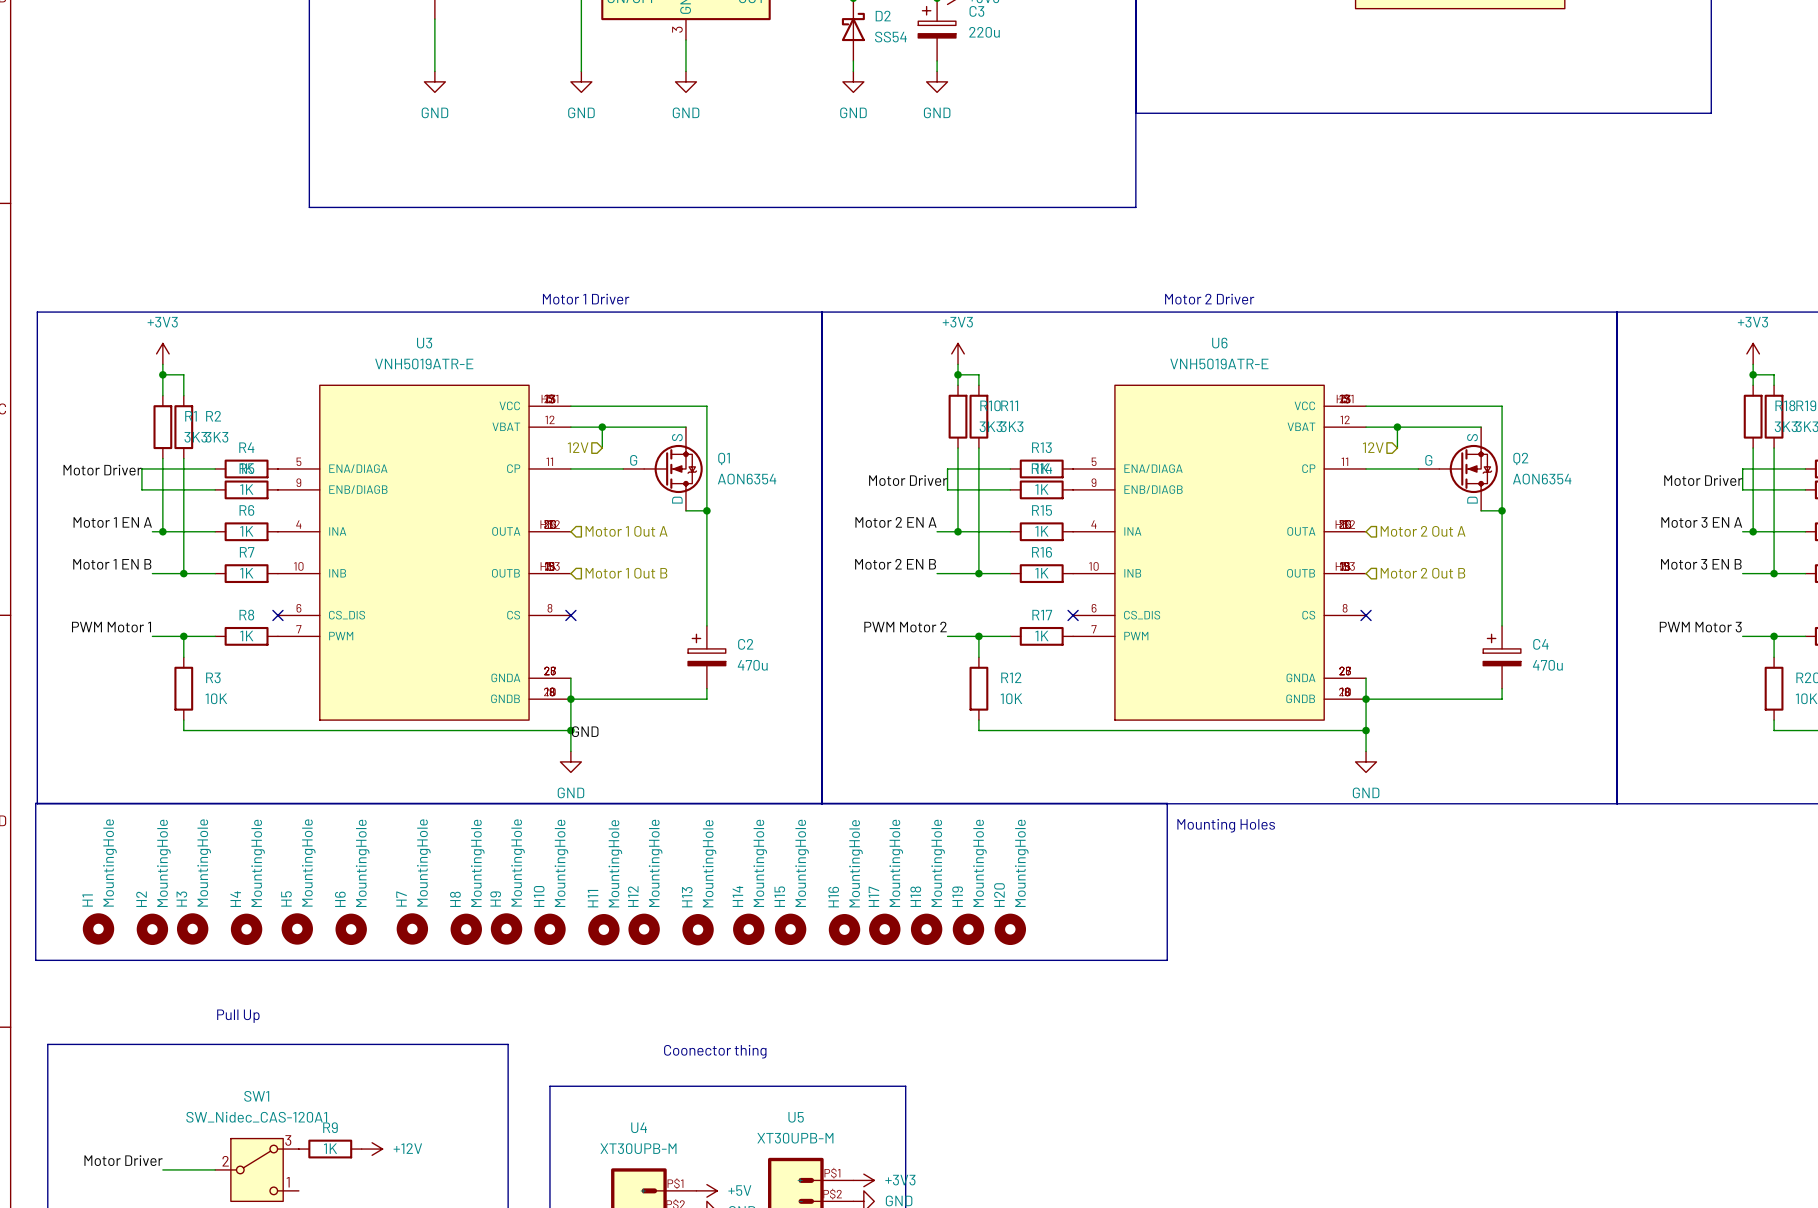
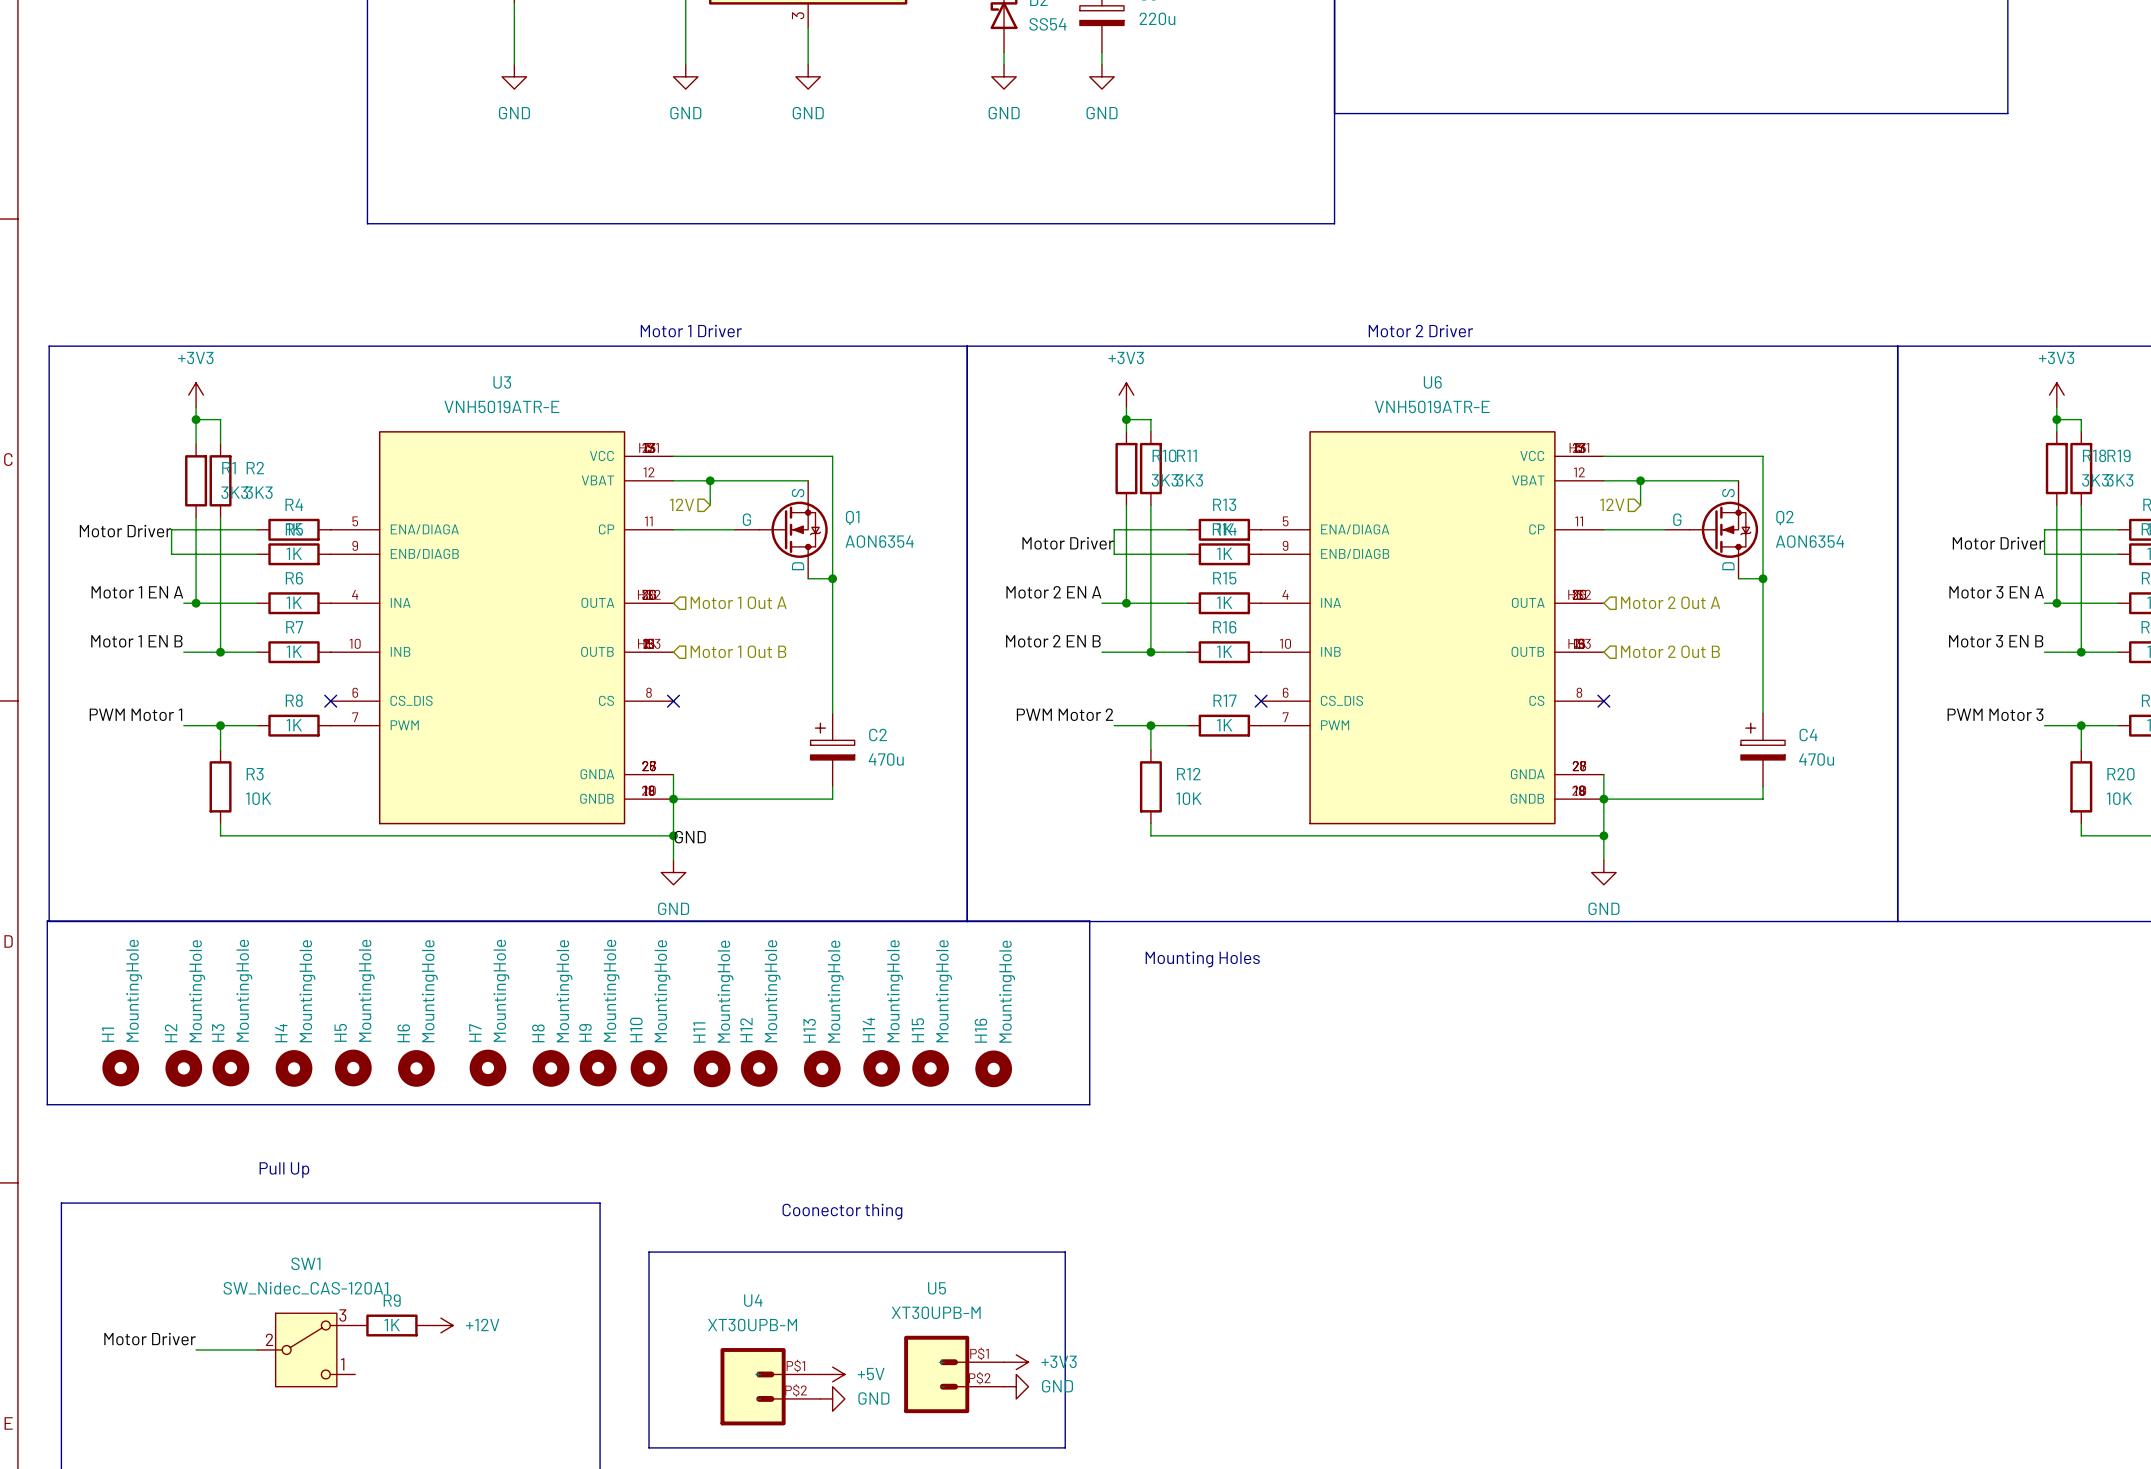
line: (926, 803) (1167, 803) (1167, 960) (926, 960) -> (1089, 921) (1089, 1104)
text position: Mounting Holes (1226, 825) -> Mounting Holes (1202, 959)
H17: MountingHole (884, 929) -> none
H18: MountingHole (926, 929) -> none
H19: MountingHole (968, 929) -> none
H20: MountingHole (1010, 929) -> none

